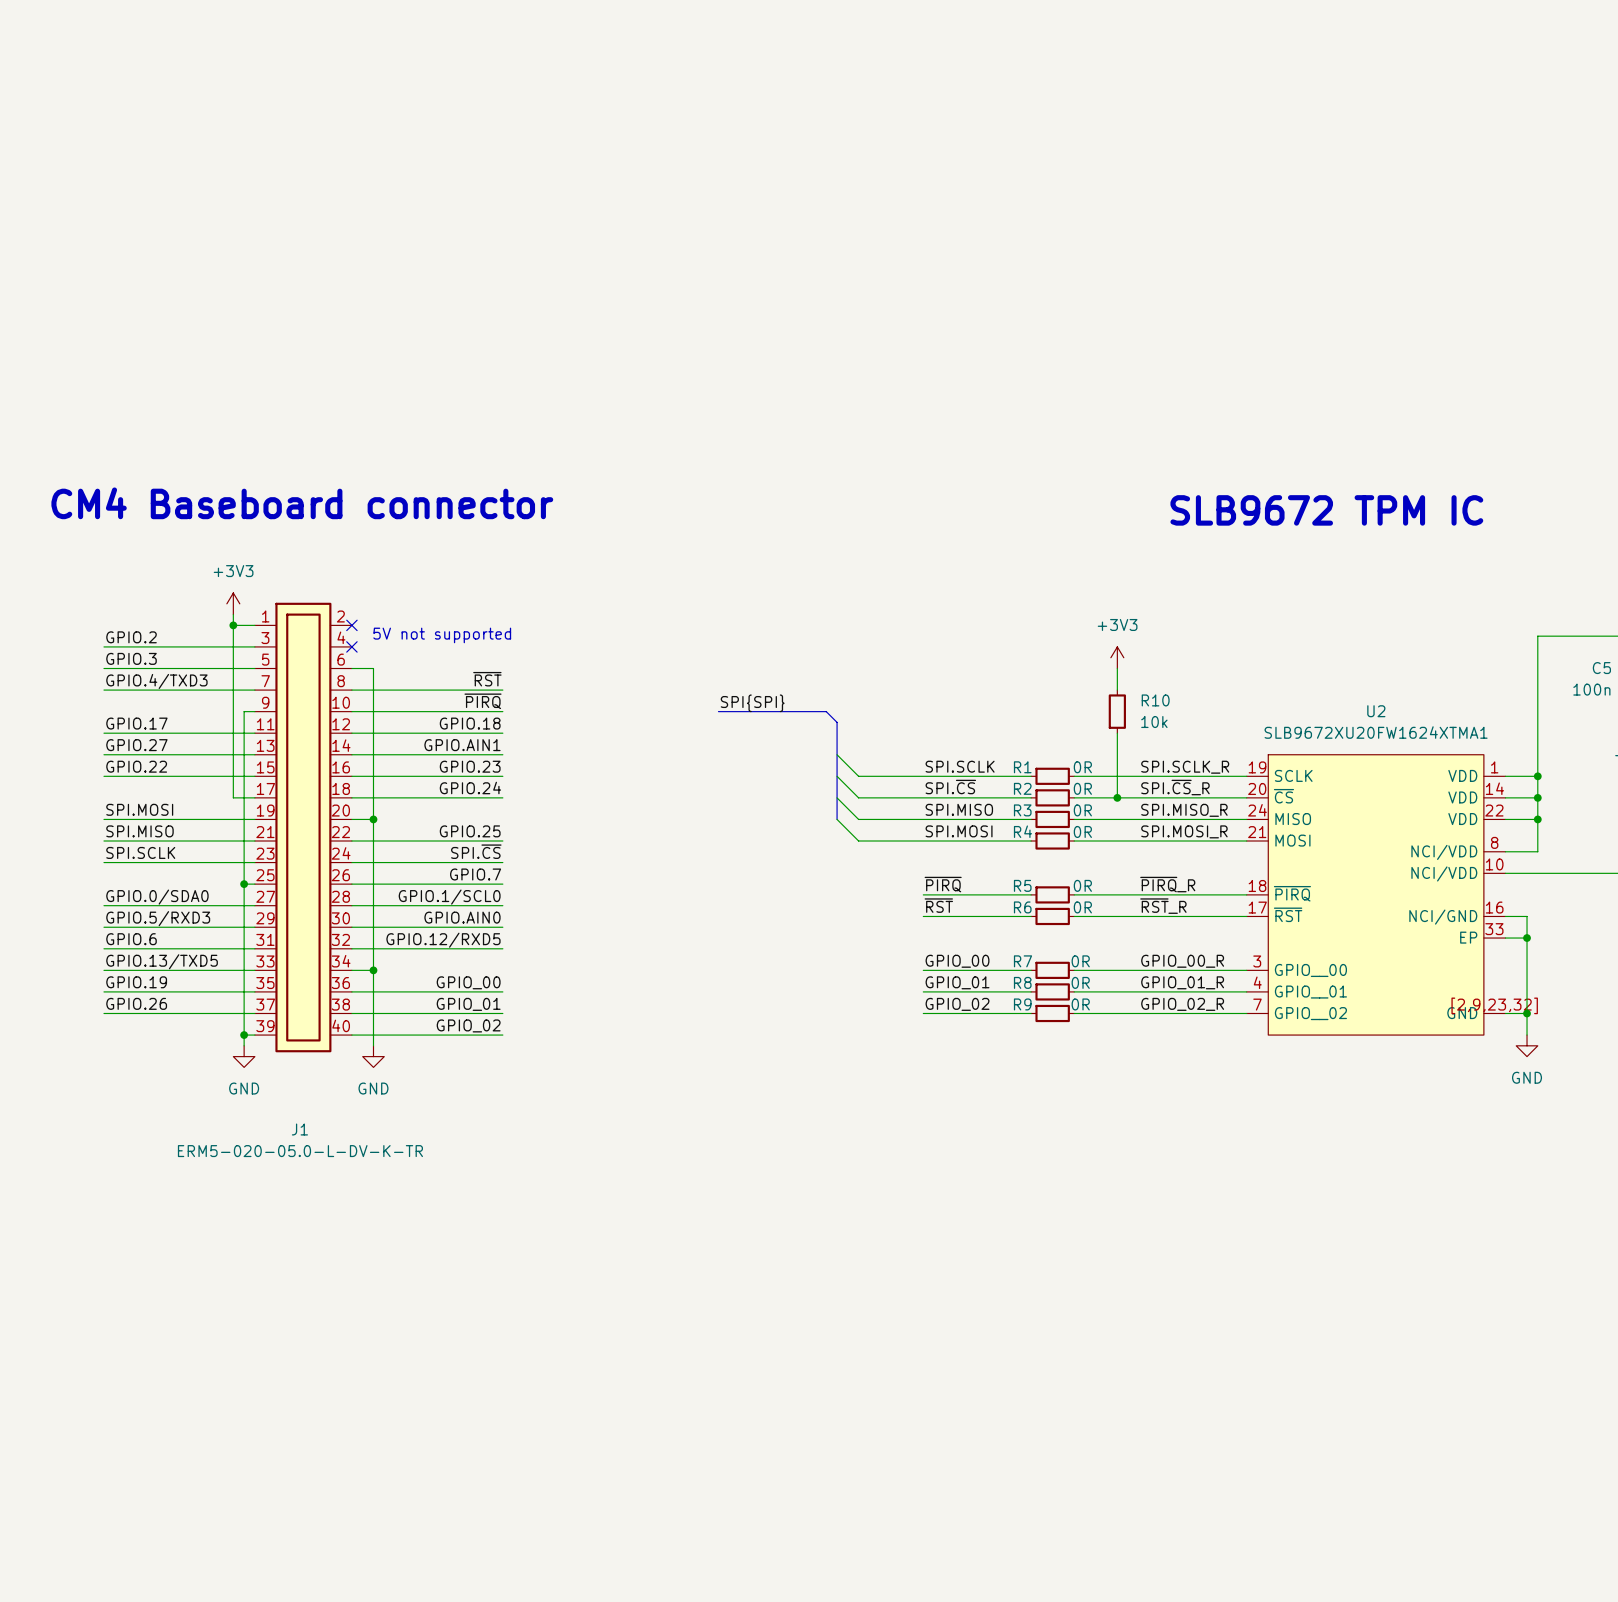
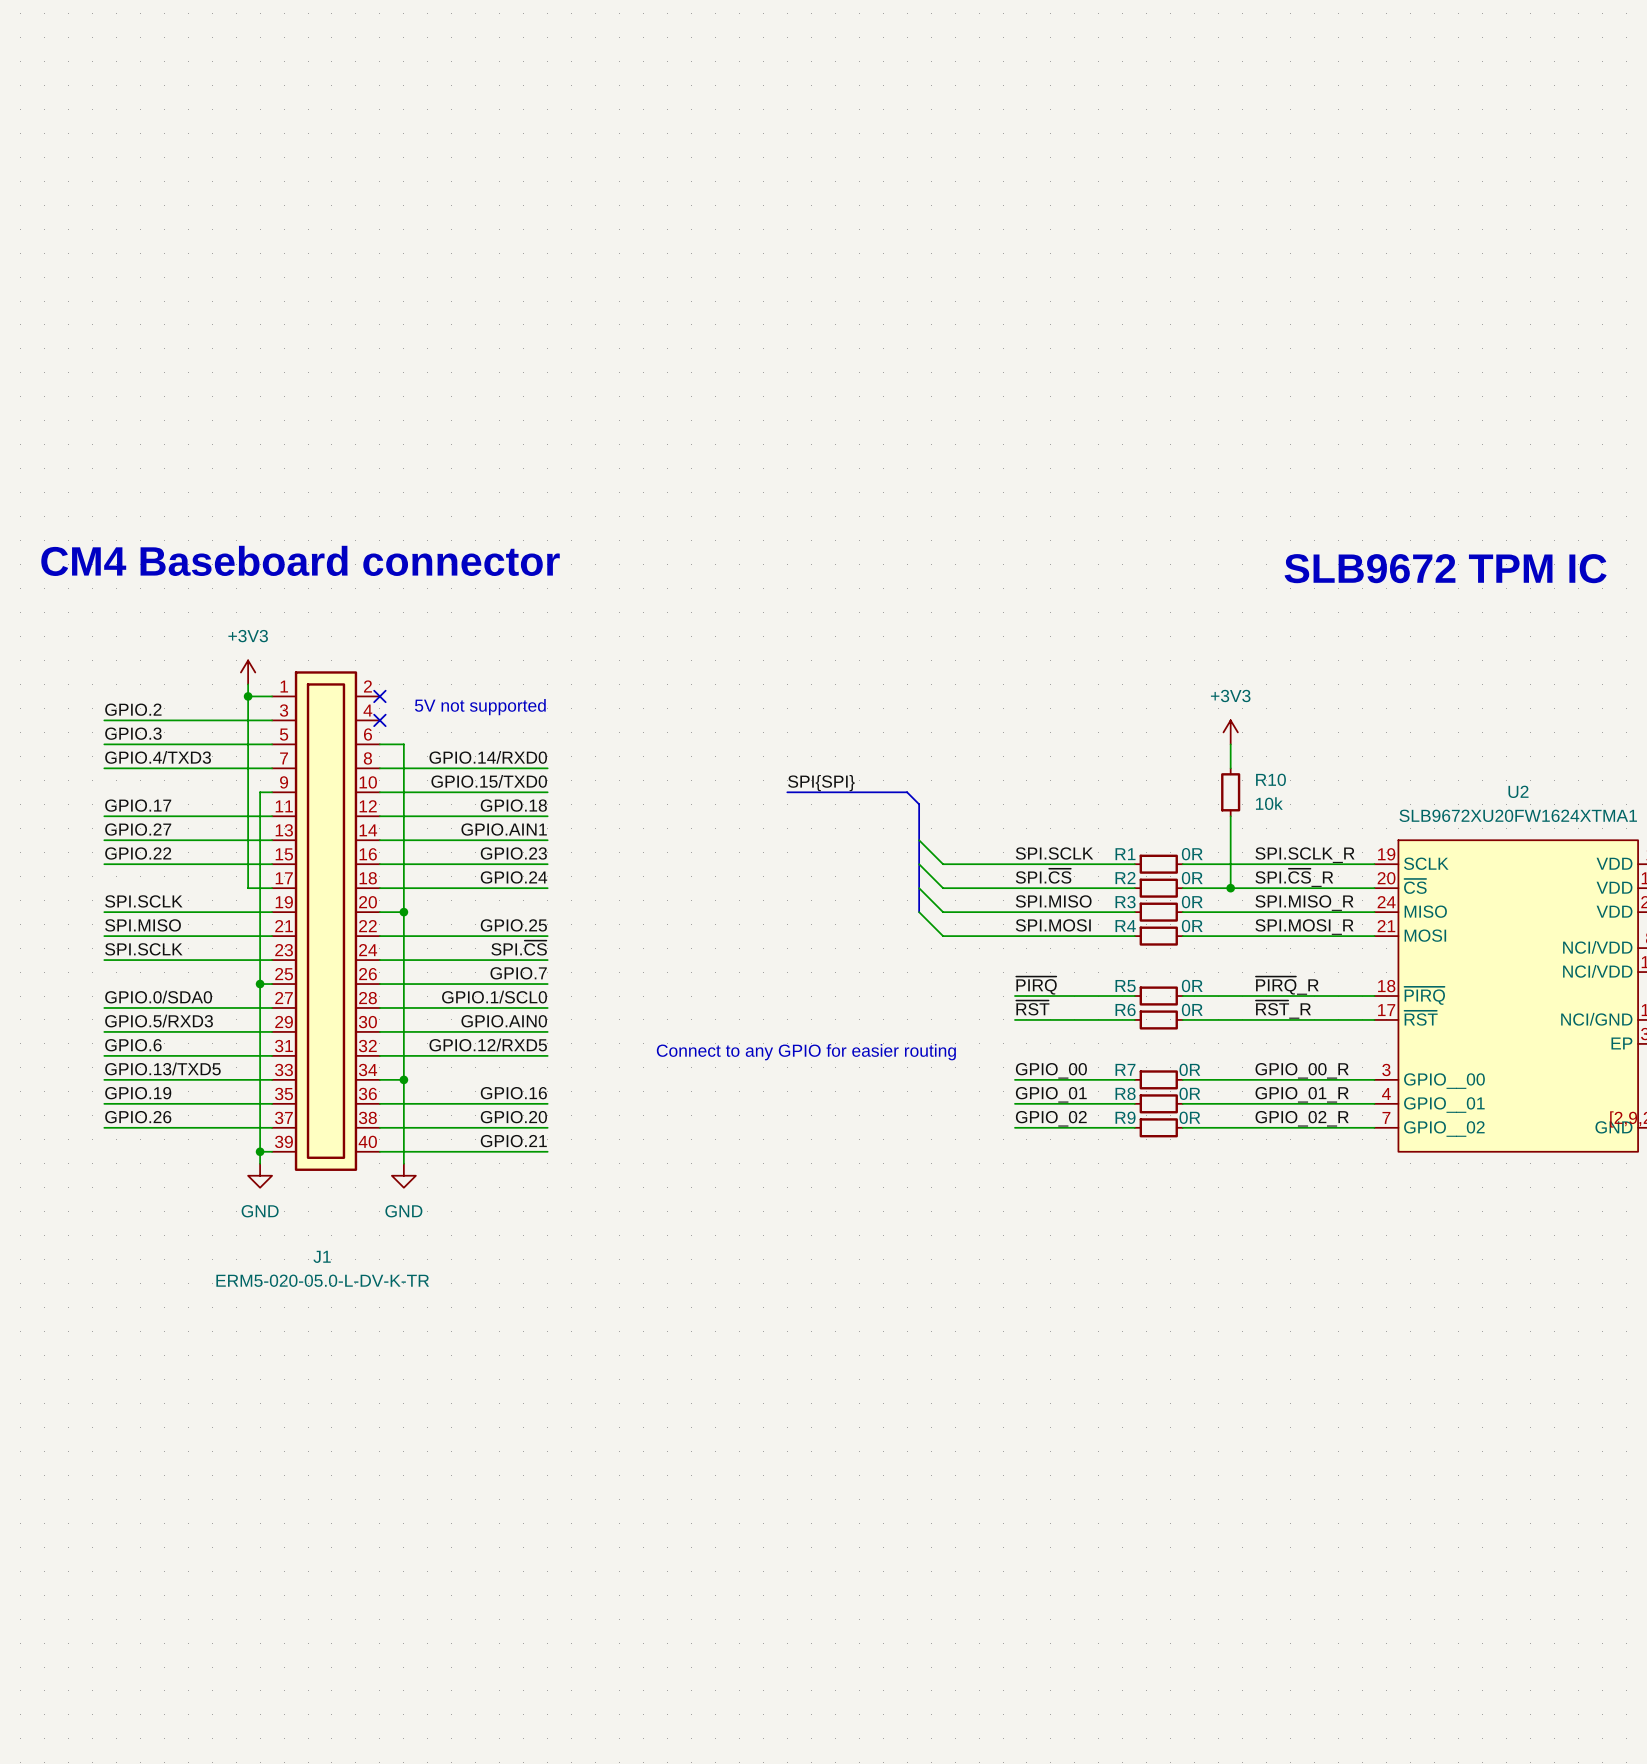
label: ~{RST} (487, 679) -> GPIO.14/RXD0 (488, 757)
label: ~{PIRQ} (483, 701) -> GPIO.15/TXD0 (489, 781)
label: SPI.MOSI (139, 809) -> SPI.SCLK (143, 901)
text: none -> Connect to any GPIO for easier routing (806, 1052)
label: GPIO_00 (468, 982) -> GPIO.16 (513, 1093)
label: GPIO_01 (468, 1004) -> GPIO.20 (513, 1117)
label: GPIO_02 (468, 1025) -> GPIO.21 (513, 1141)

